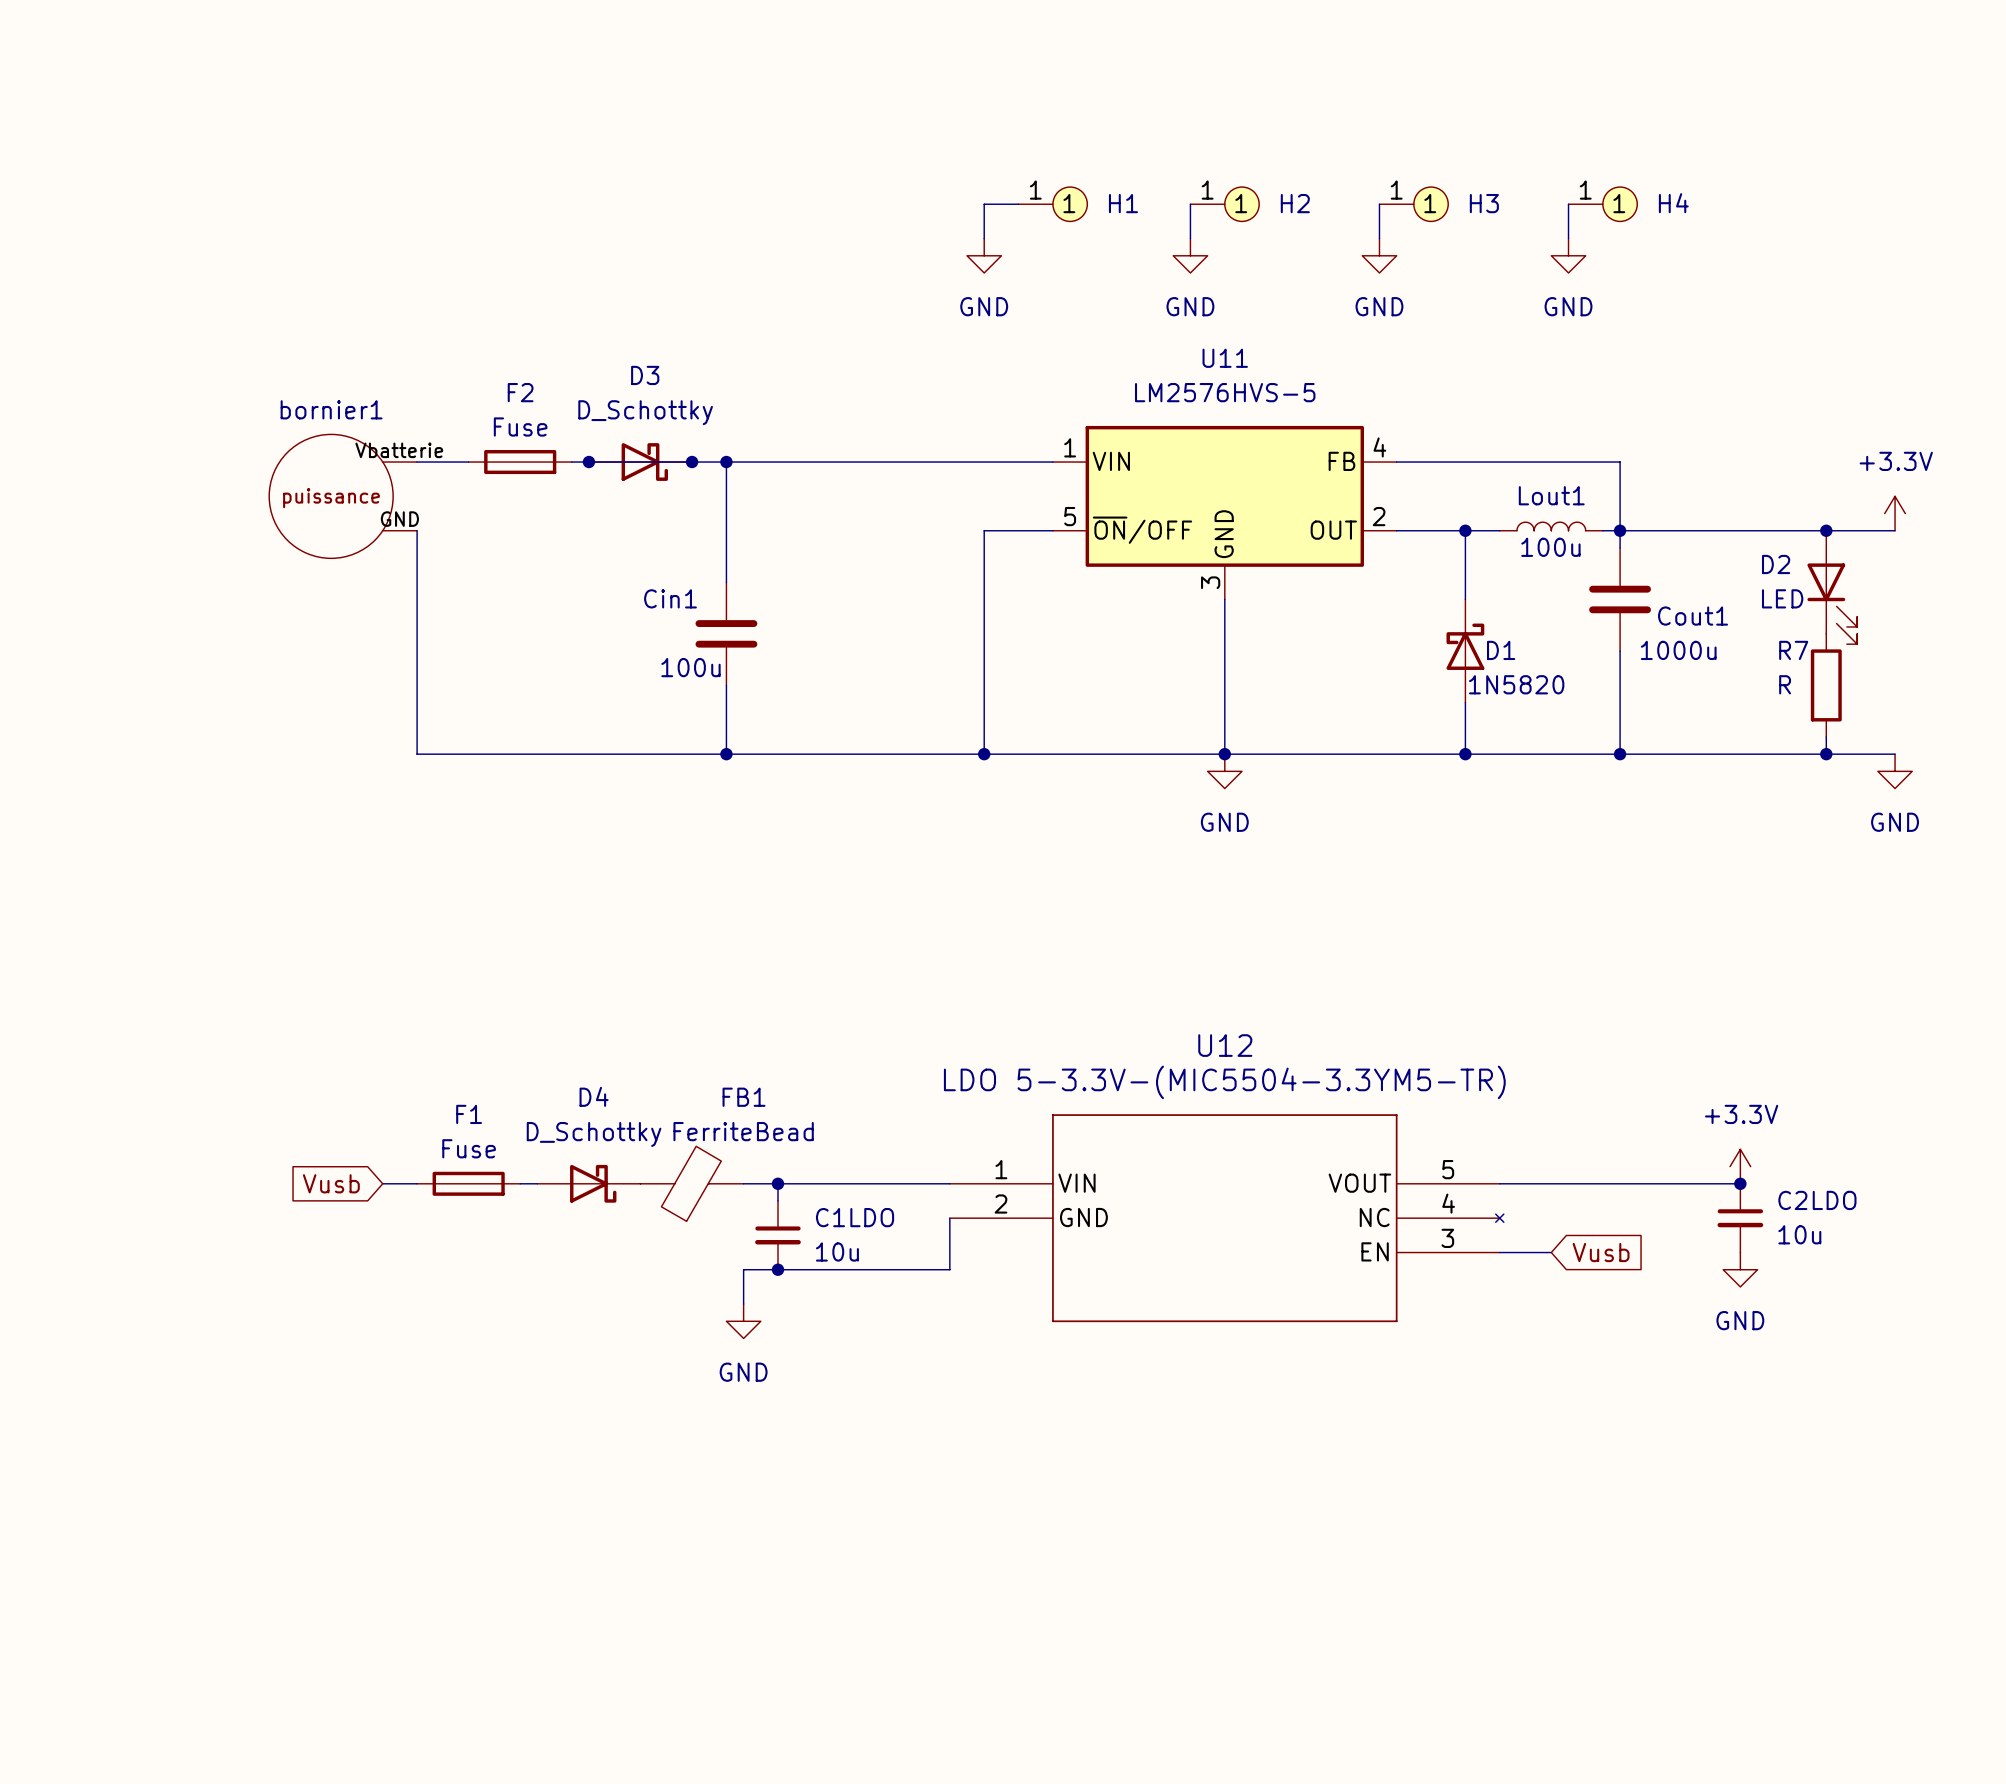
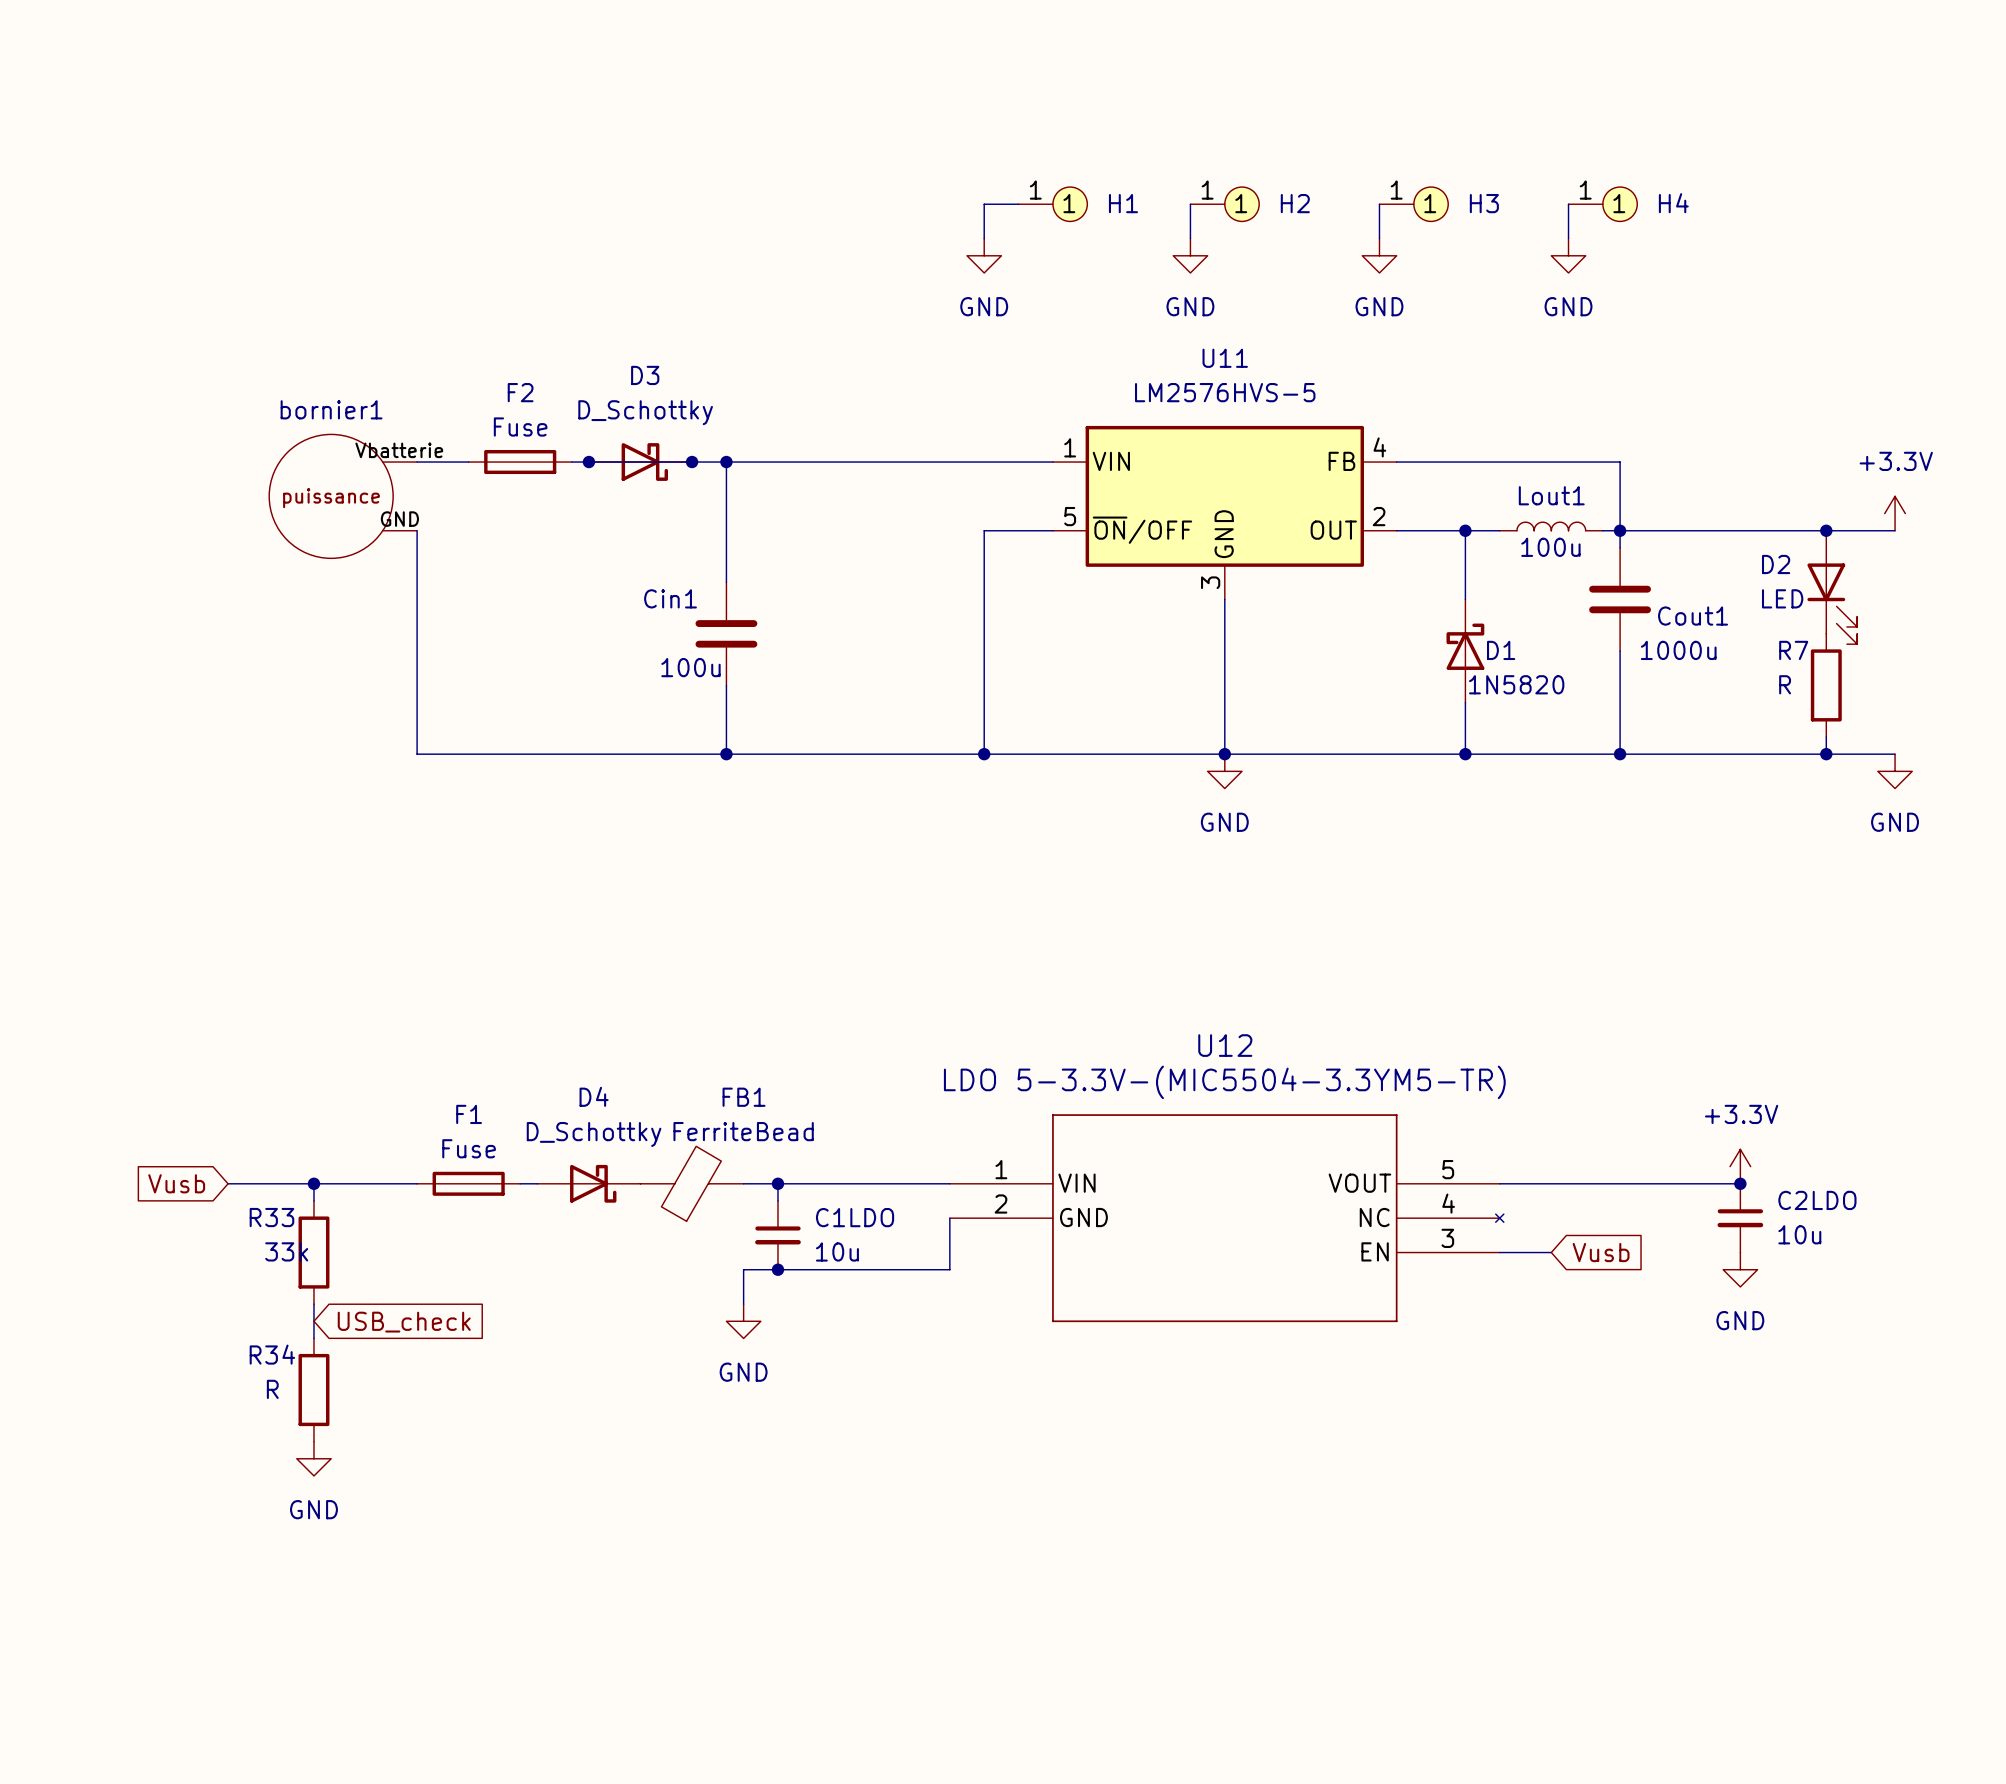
wire: none -> (228, 1183) (382, 1183)
wire: none -> (313, 1183) (313, 1200)
junction: none -> (313, 1183)
global label position: Vusb (331, 1183) -> Vusb (176, 1183)
R33: none -> 33k (313, 1252)
wire: none -> (313, 1304) (313, 1338)
global label: none -> USB_check (404, 1322)
R34: none -> R (313, 1390)
power symbol: none -> GND (313, 1458)

